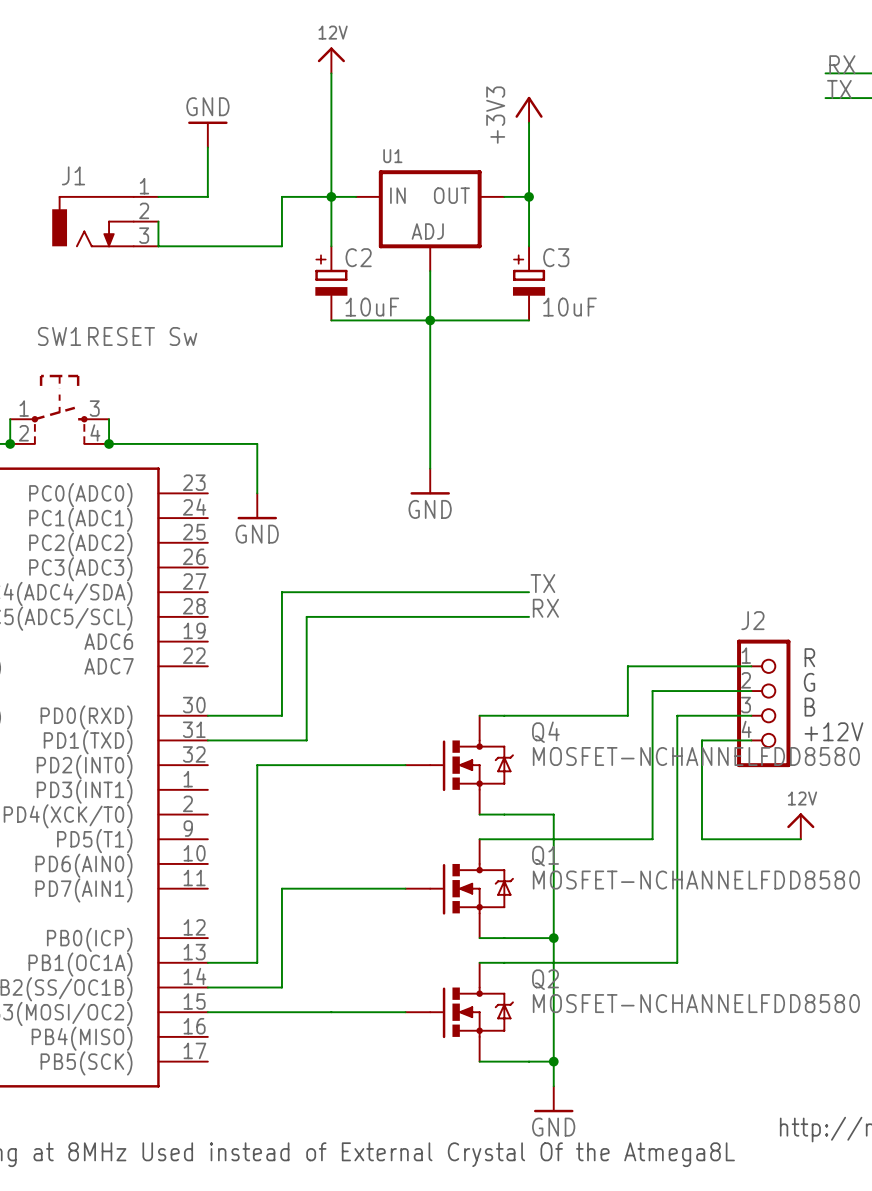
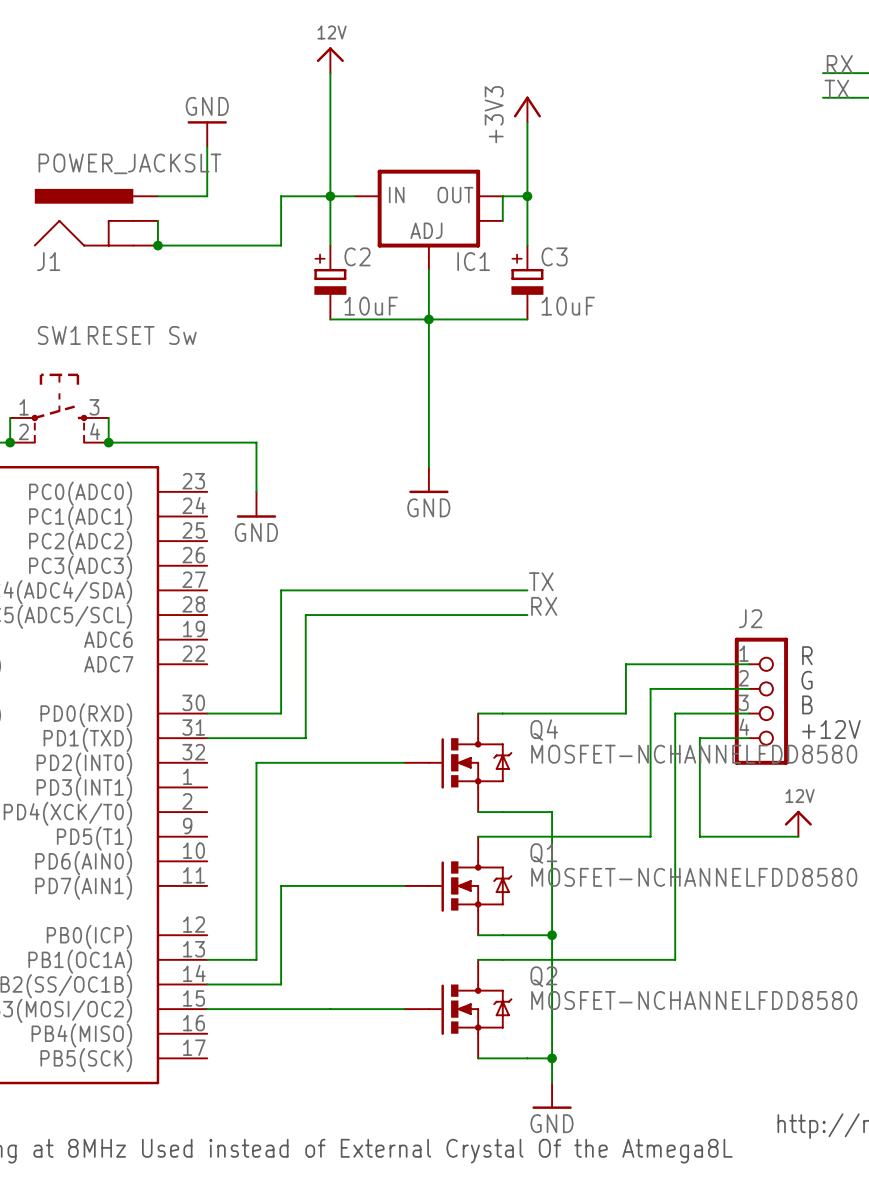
J1 value: none -> POWER_JACKSLT (129, 163)
J1 name position: J1 (73, 175) -> J1 (48, 261)
J1 symbol: [52, 196, 159, 248] -> [34, 188, 158, 247]
wire: none -> (502, 196) (502, 220)
U1: (430, 220) -> none
IC1: none -> (428, 219)
junction: none -> (157, 245)

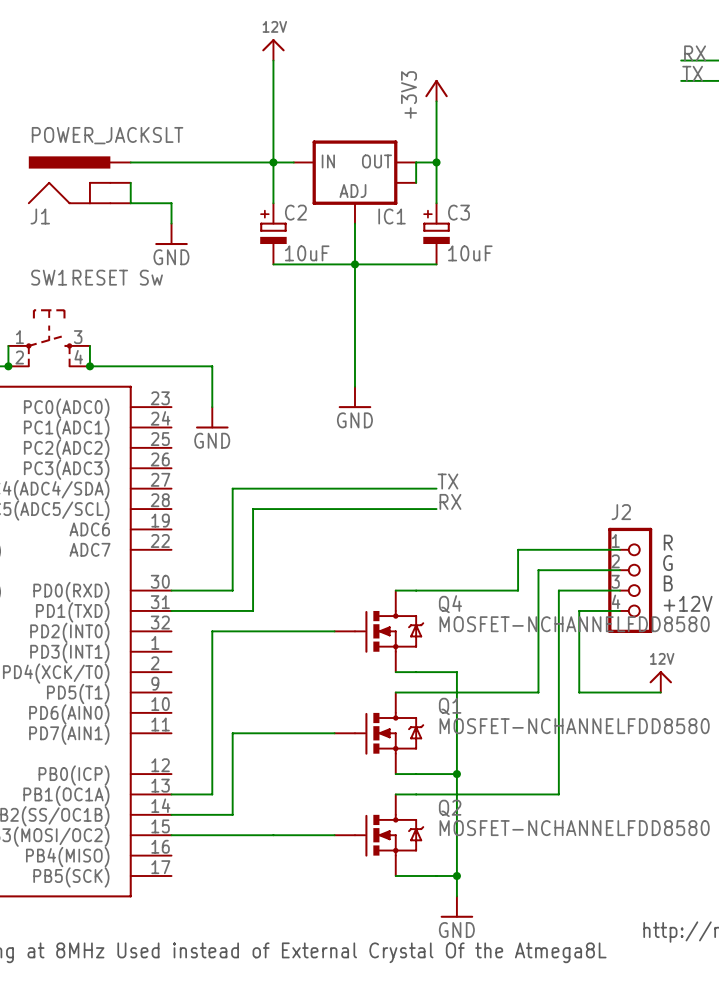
power symbol rotation: 0° (207, 122) -> 180° (171, 244)
power symbol position: GND (207, 134) -> GND (171, 234)
wire: (207, 147) (207, 196) -> none
wire: (281, 196) (281, 245) (207, 245) -> (232, 162) (171, 162)
junction: (157, 245) -> none
wire: none -> (171, 203) (171, 223)

